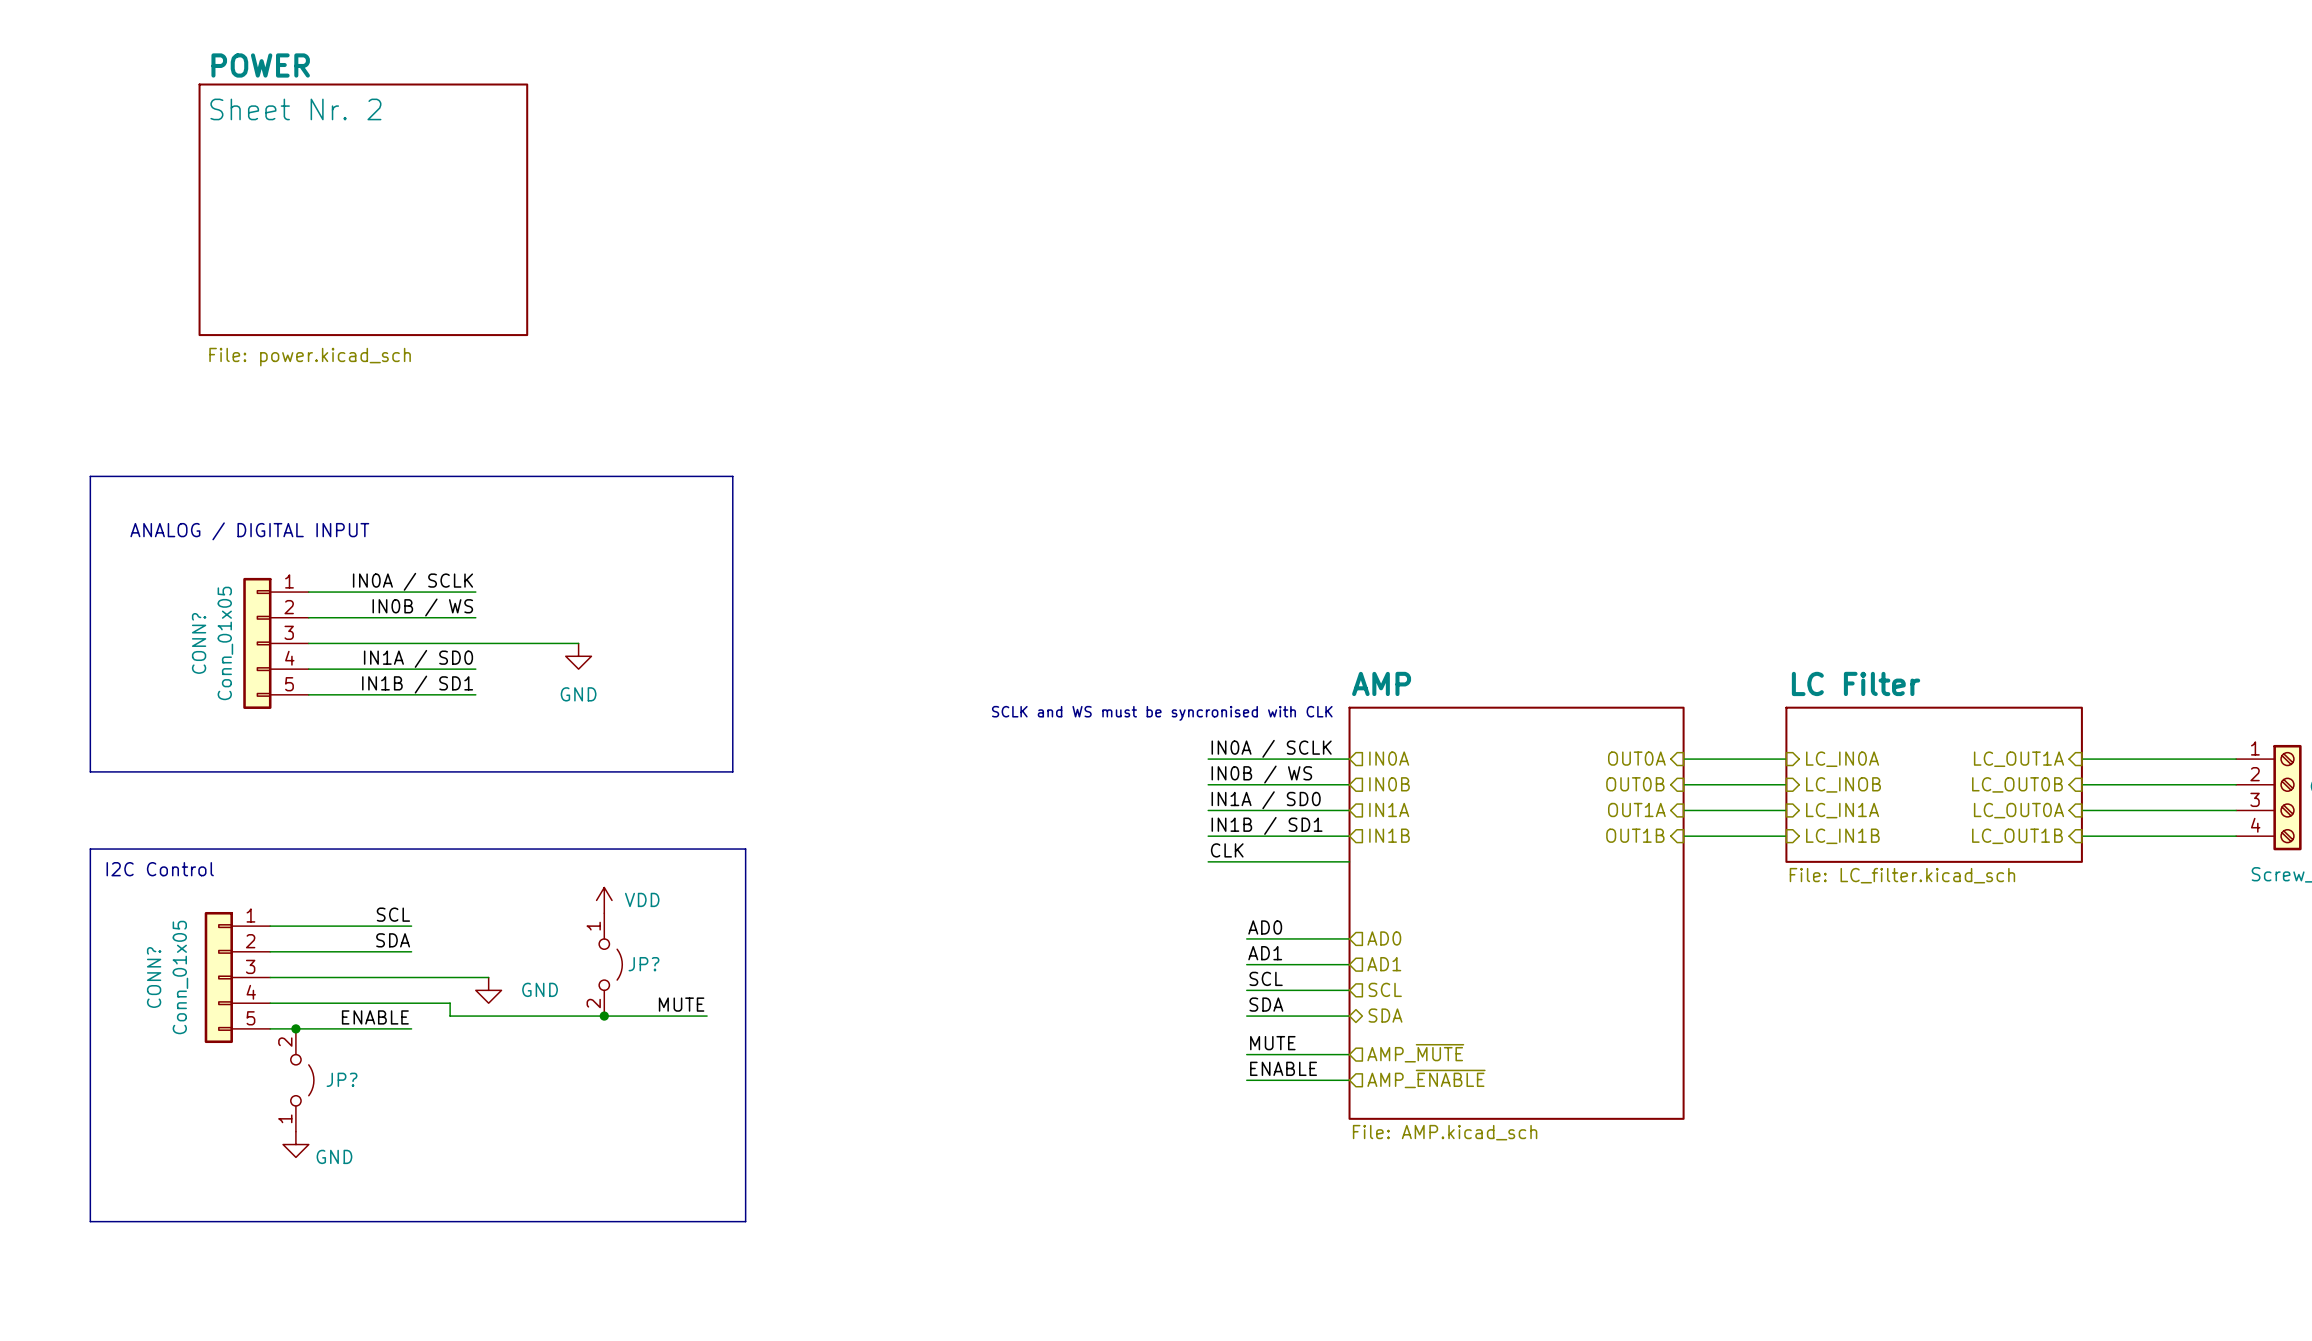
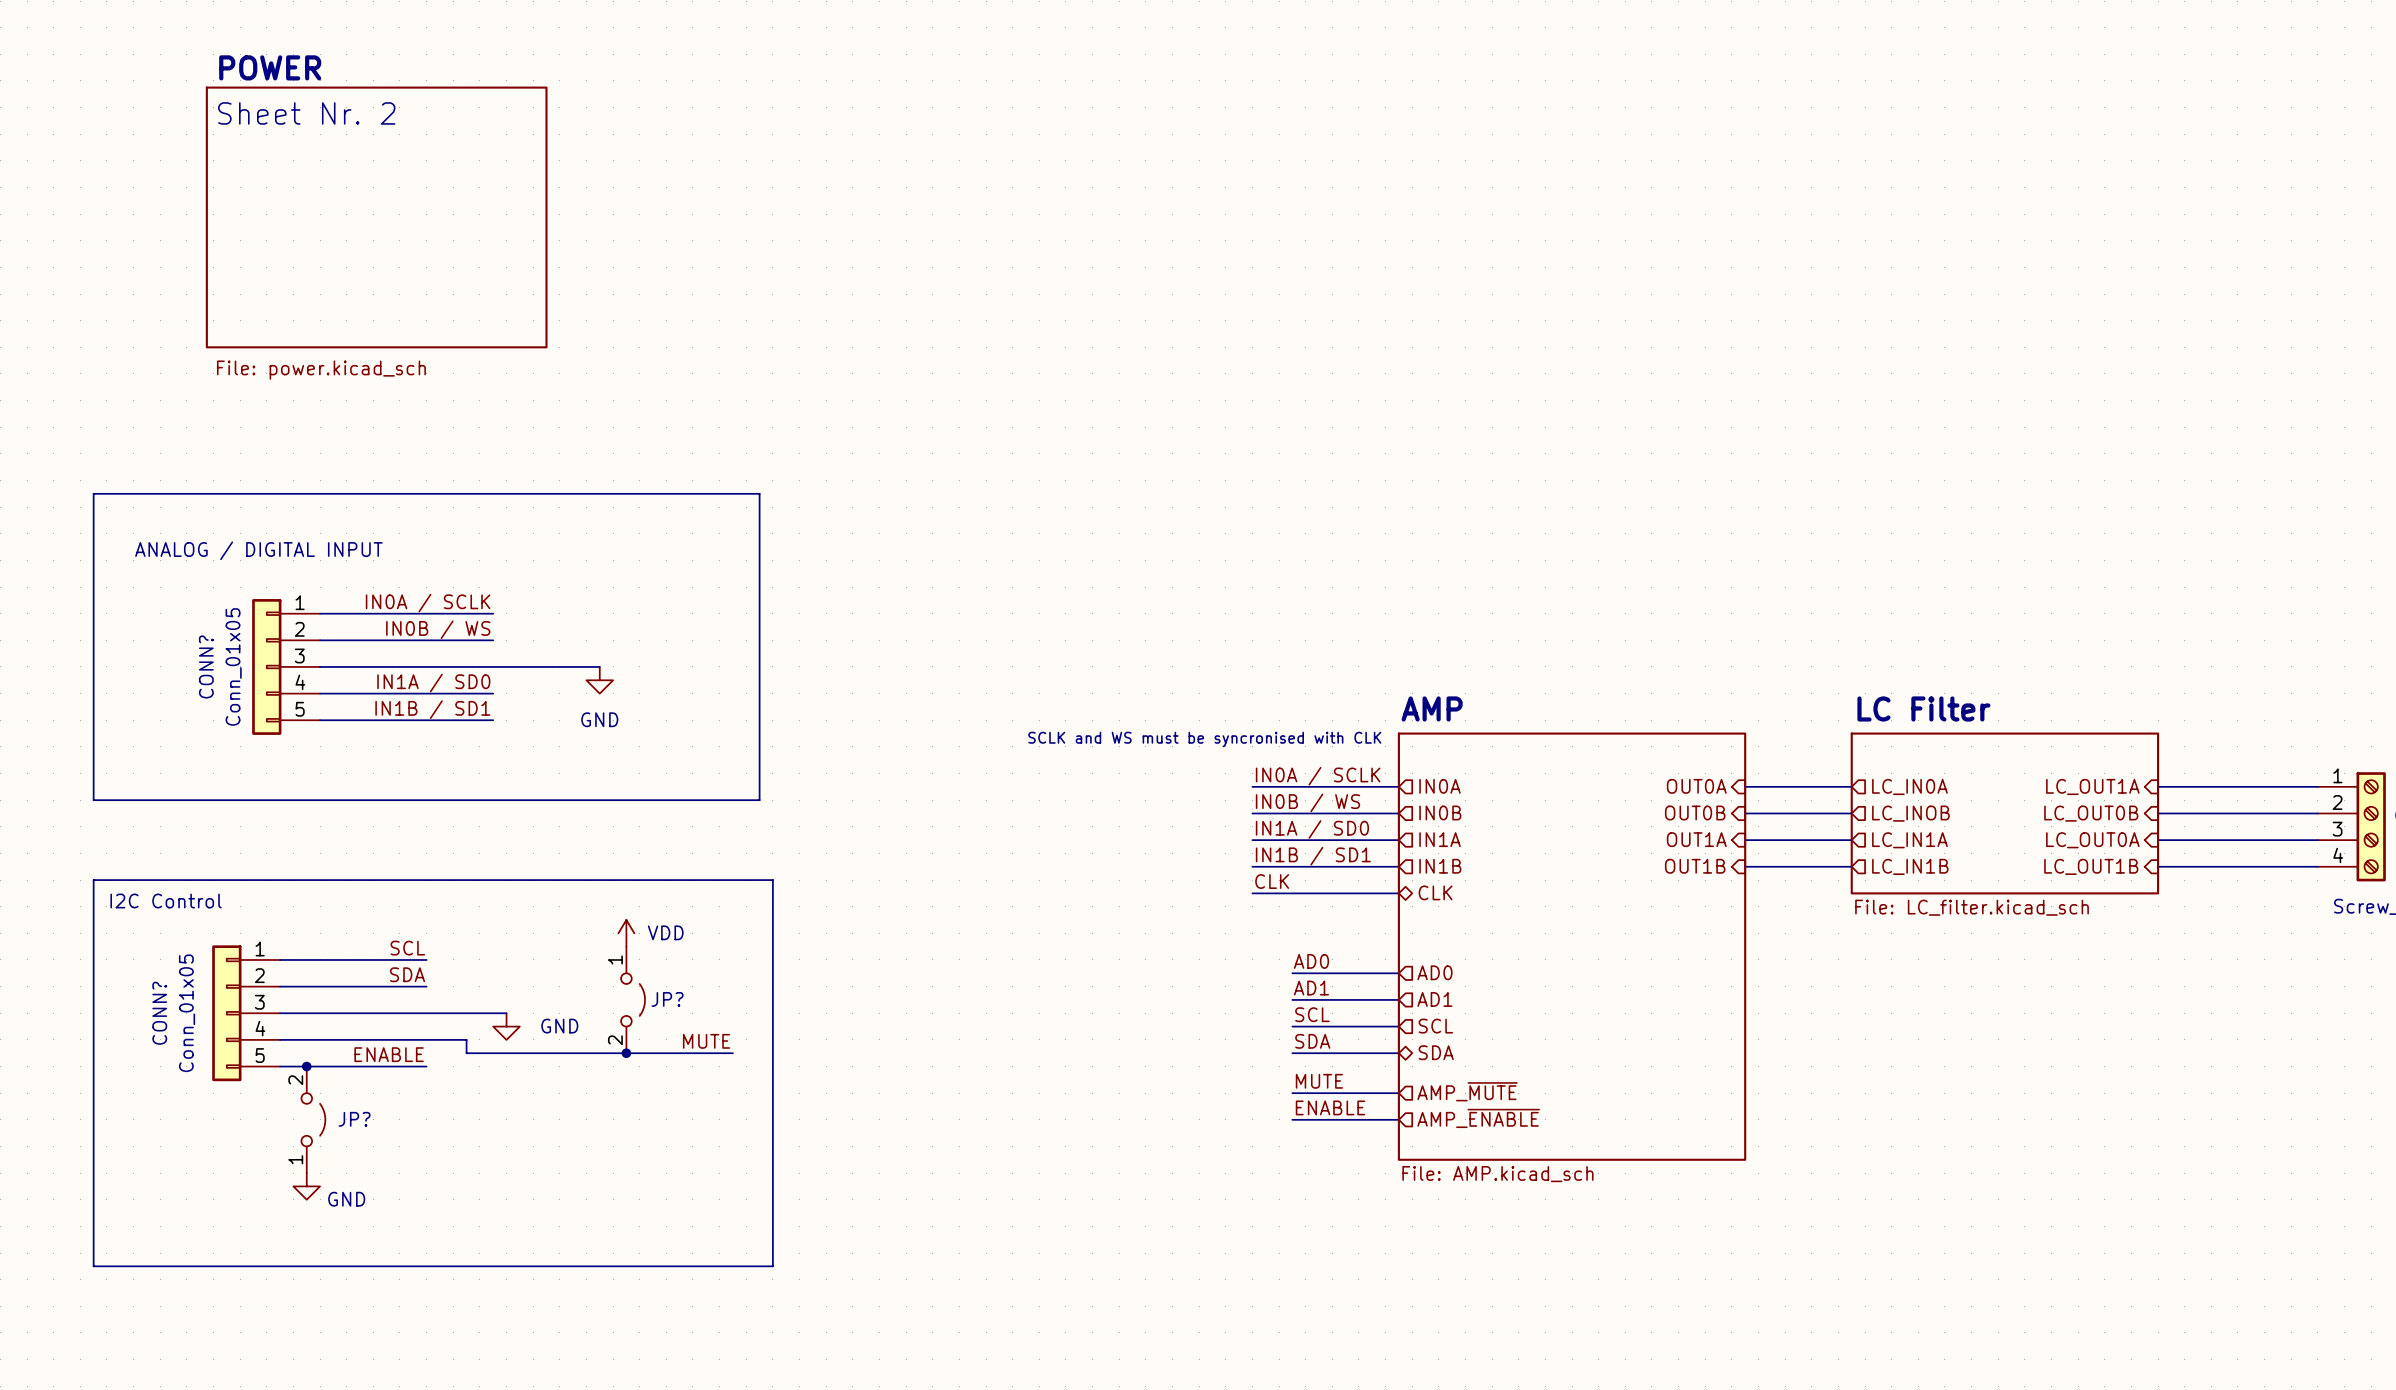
hierarchical label shape: output (1842, 759) -> input (1909, 786)
hierarchical label shape: output (1843, 784) -> input (1910, 813)
hierarchical label shape: output (1842, 810) -> input (1909, 840)
hierarchical label shape: output (1842, 836) -> input (1910, 866)
hierarchical label: none -> CLK (1435, 892)

